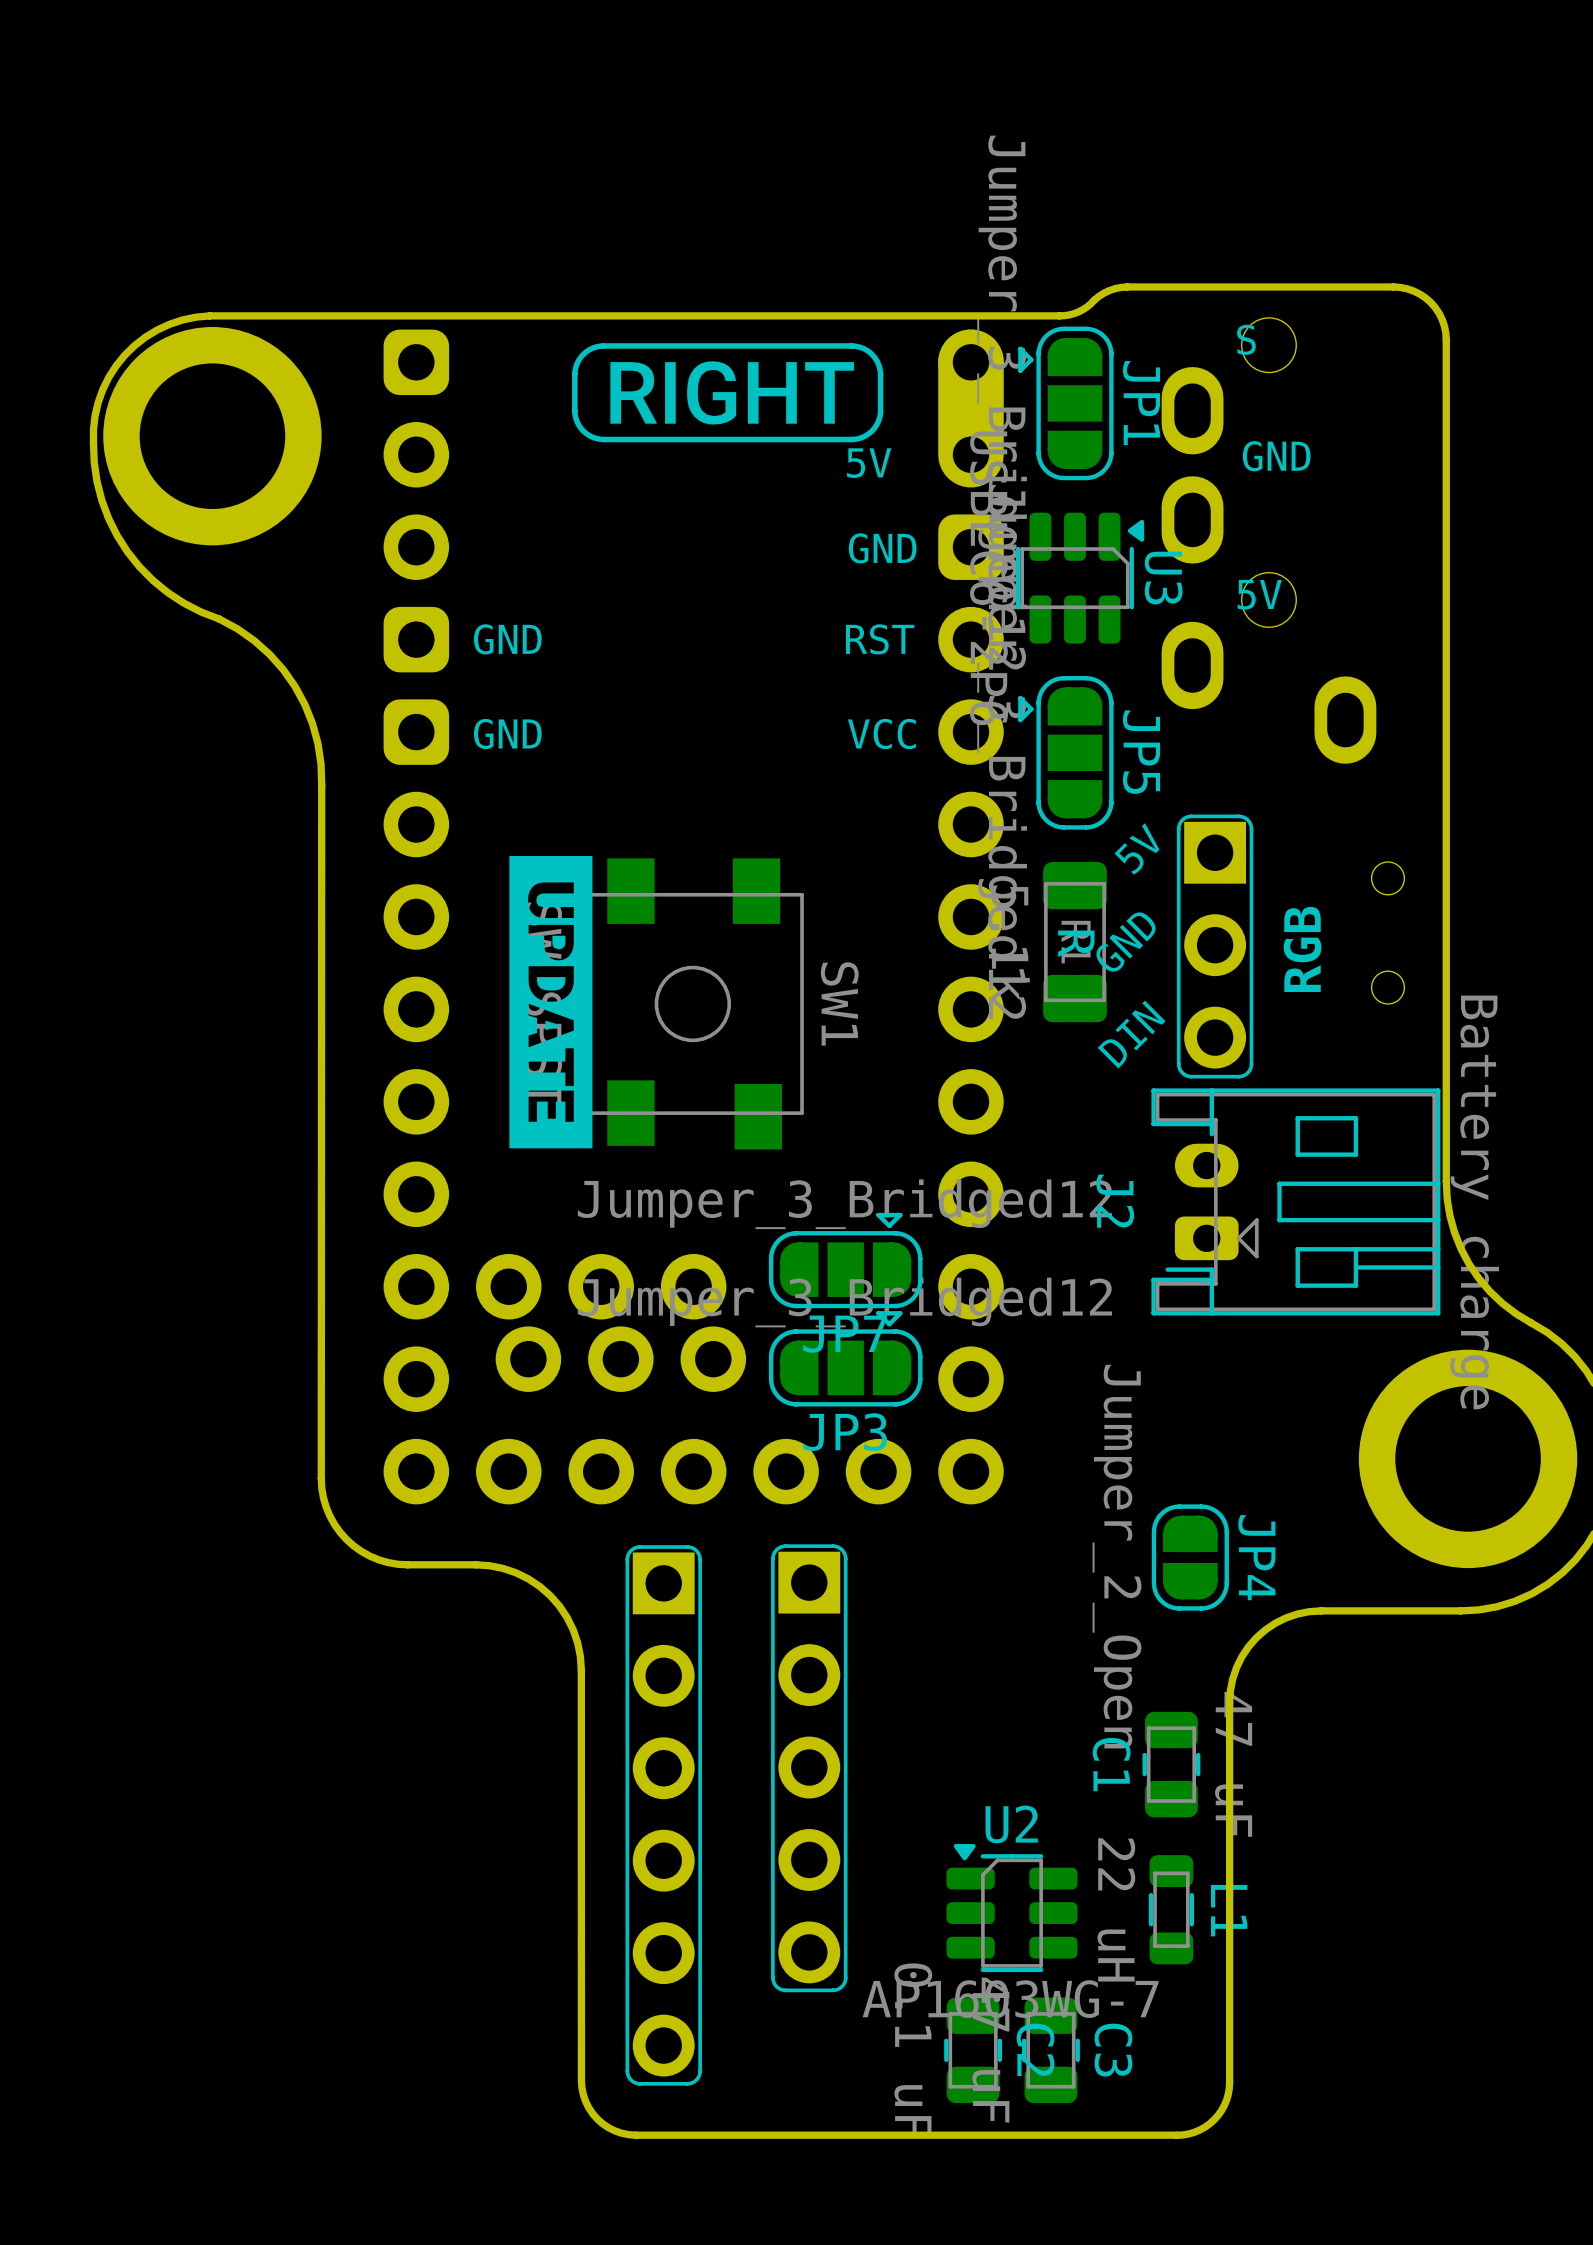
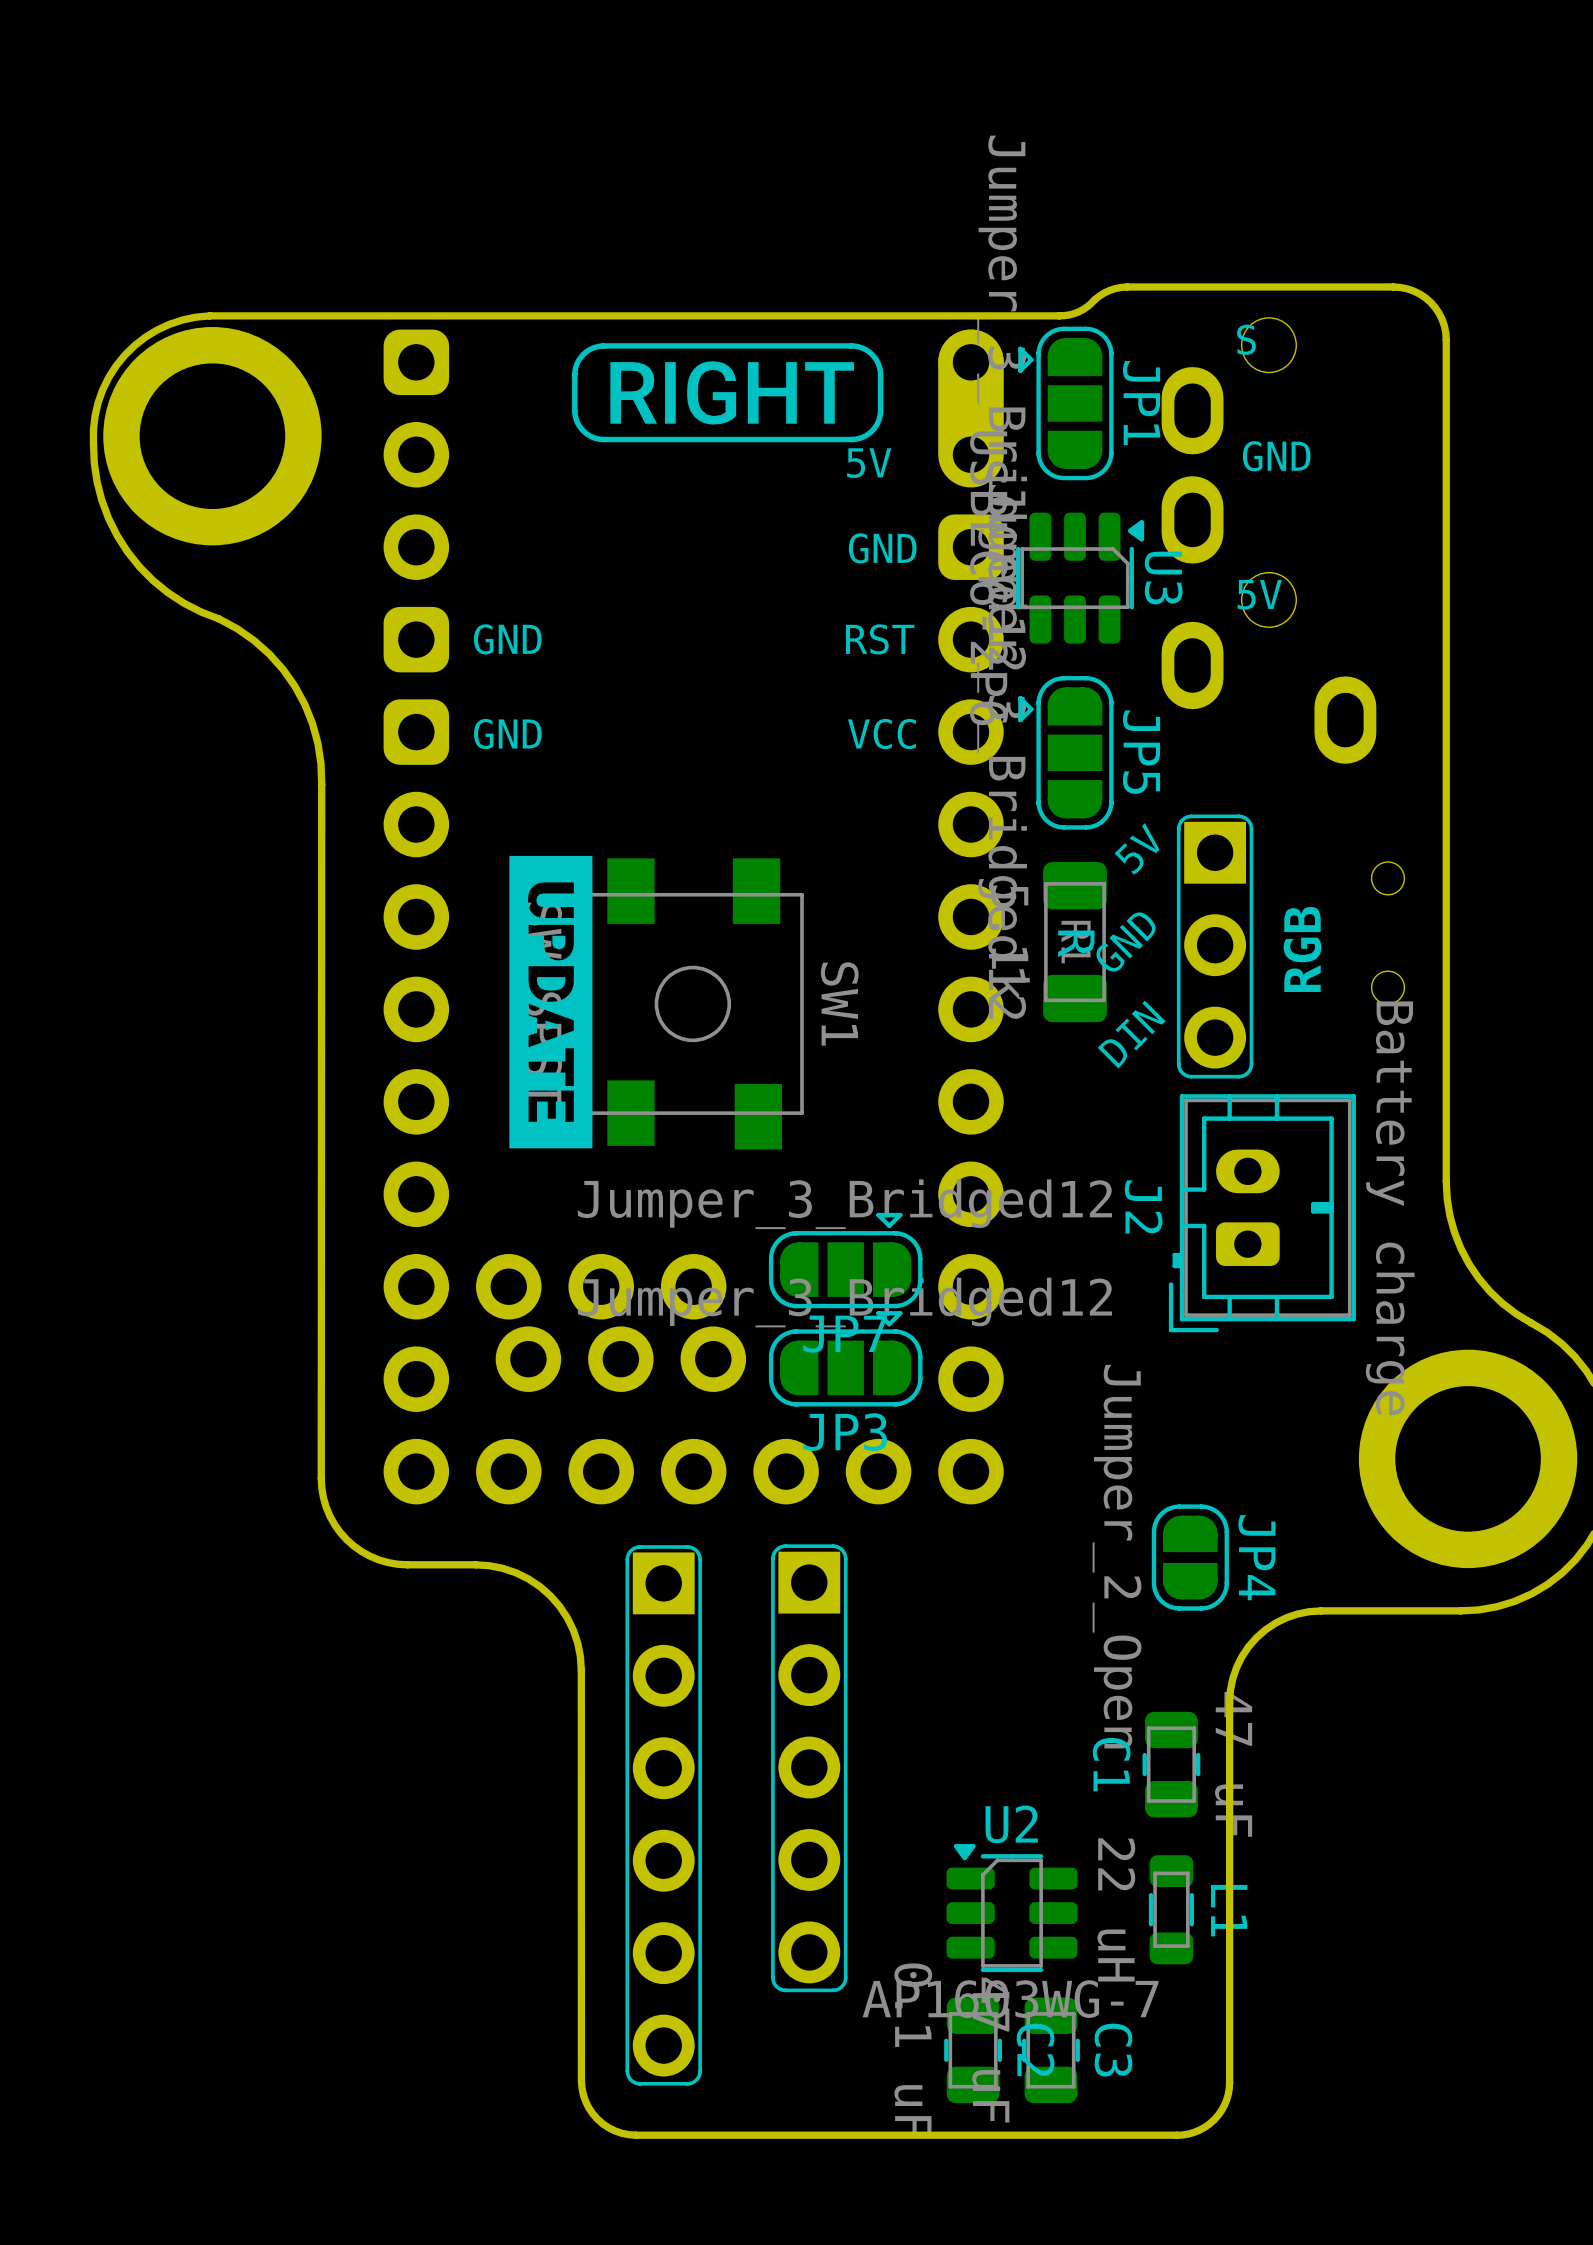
J2 footprint: [1151, 1088, 1441, 1316] -> [1168, 1094, 1356, 1333]

